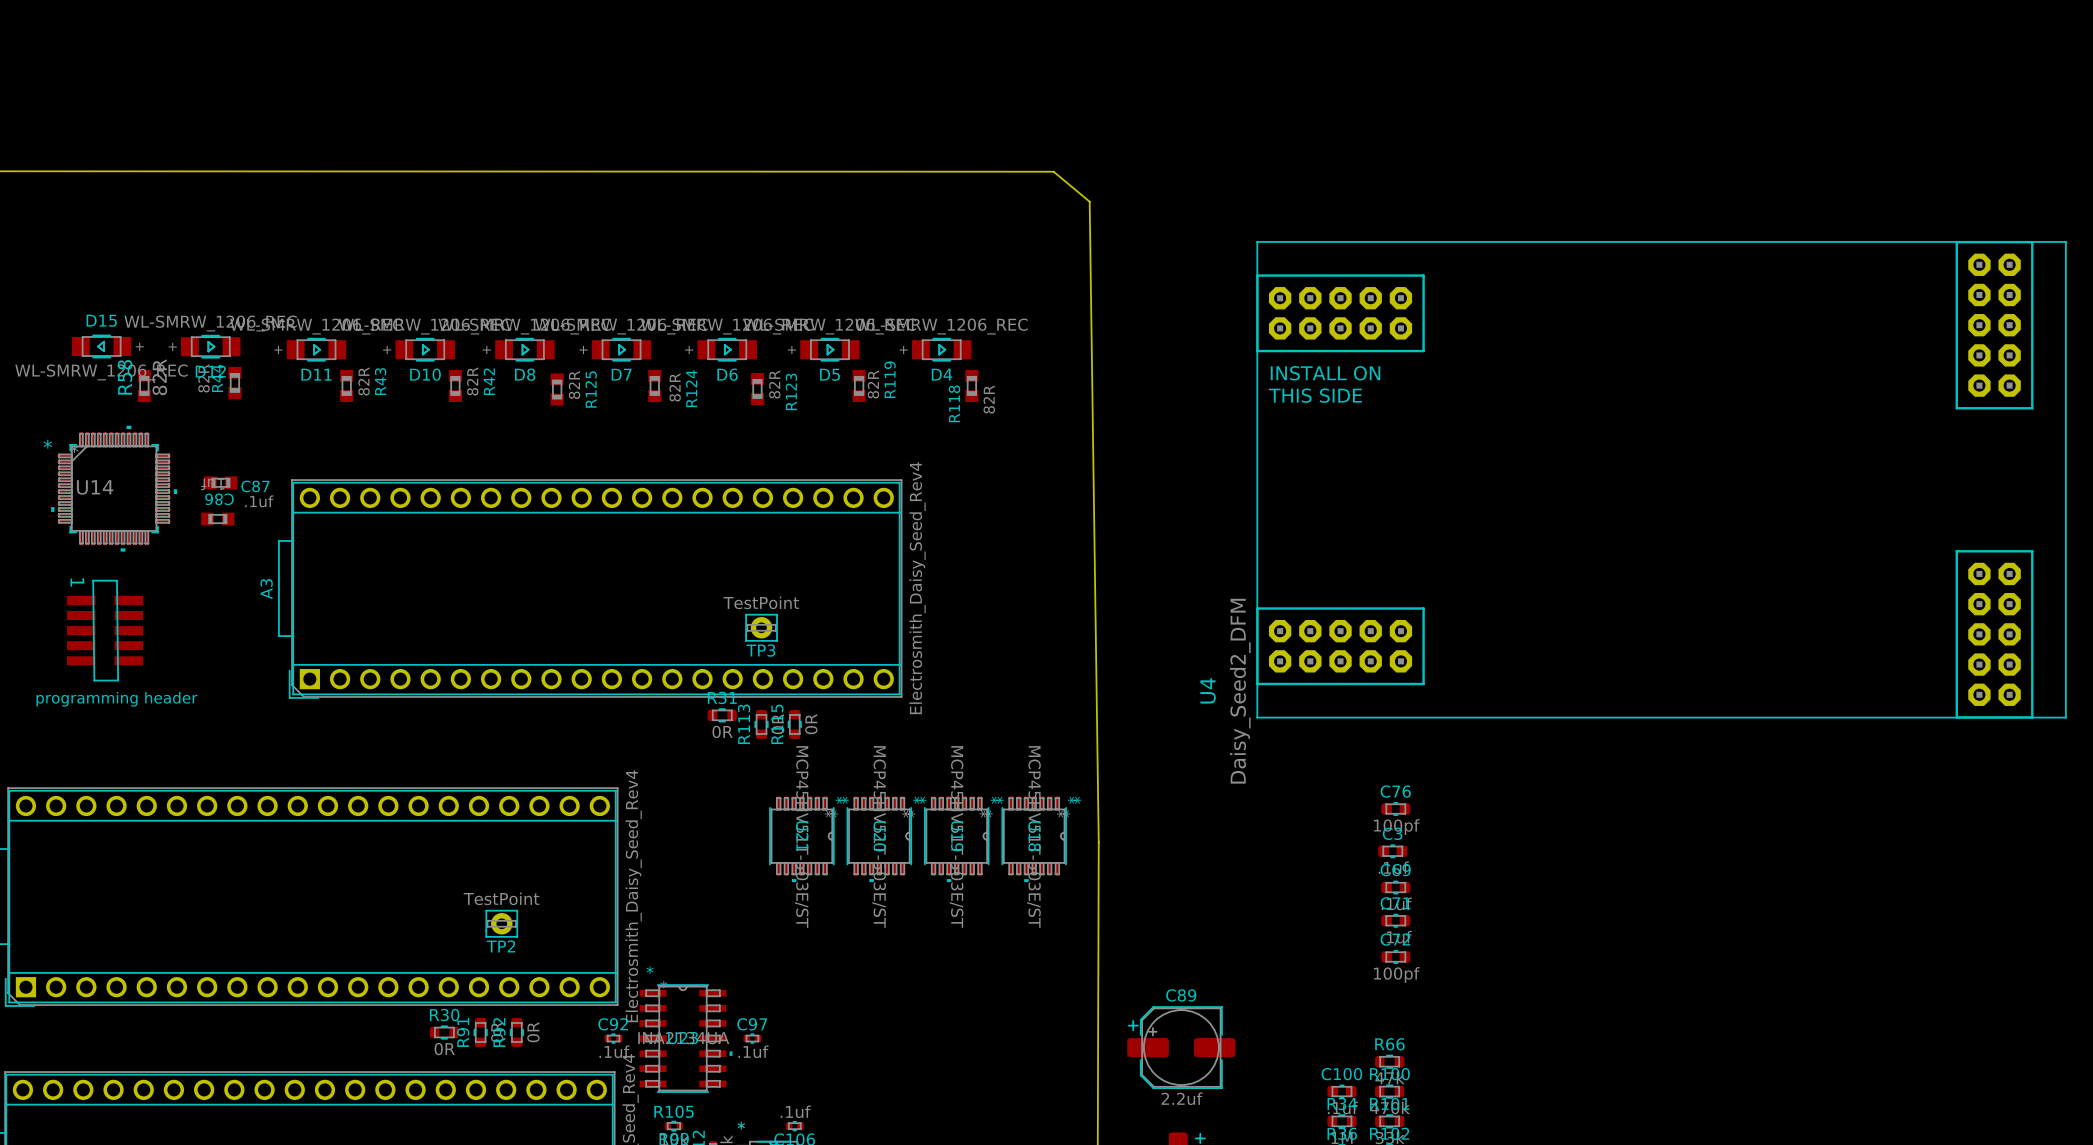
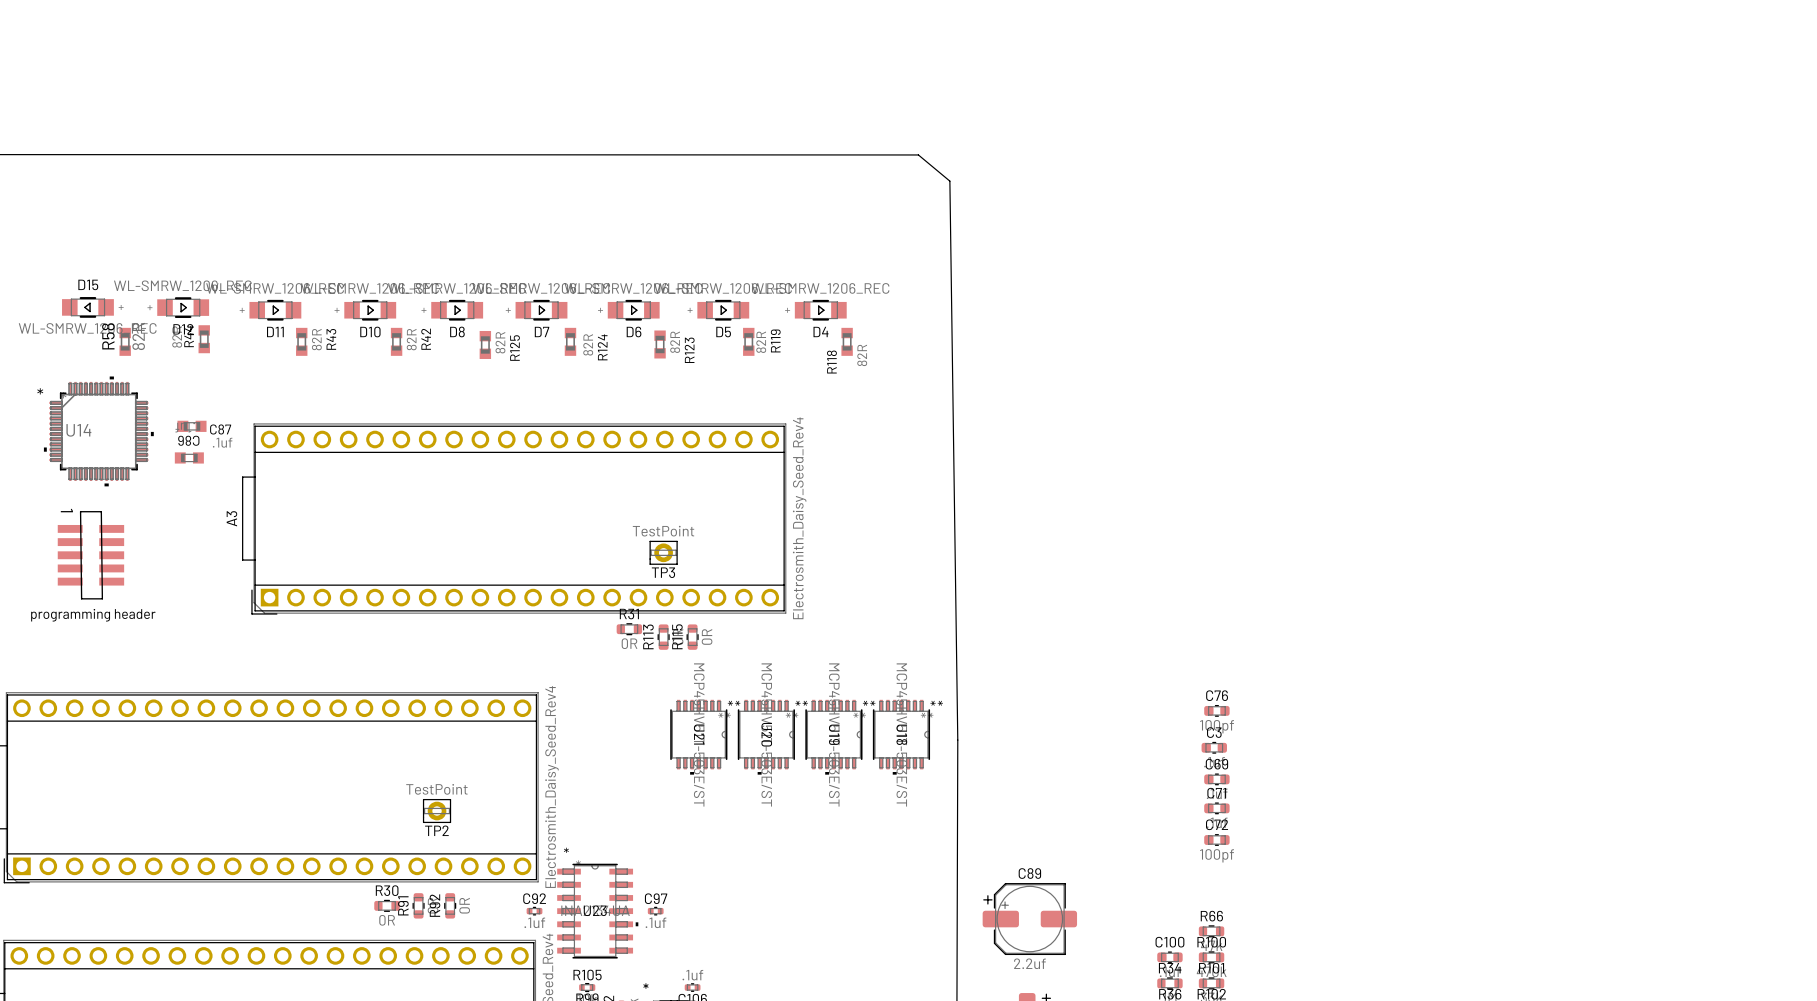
U4: Daisy_Seed2_DFM (1661, 479) -> none

